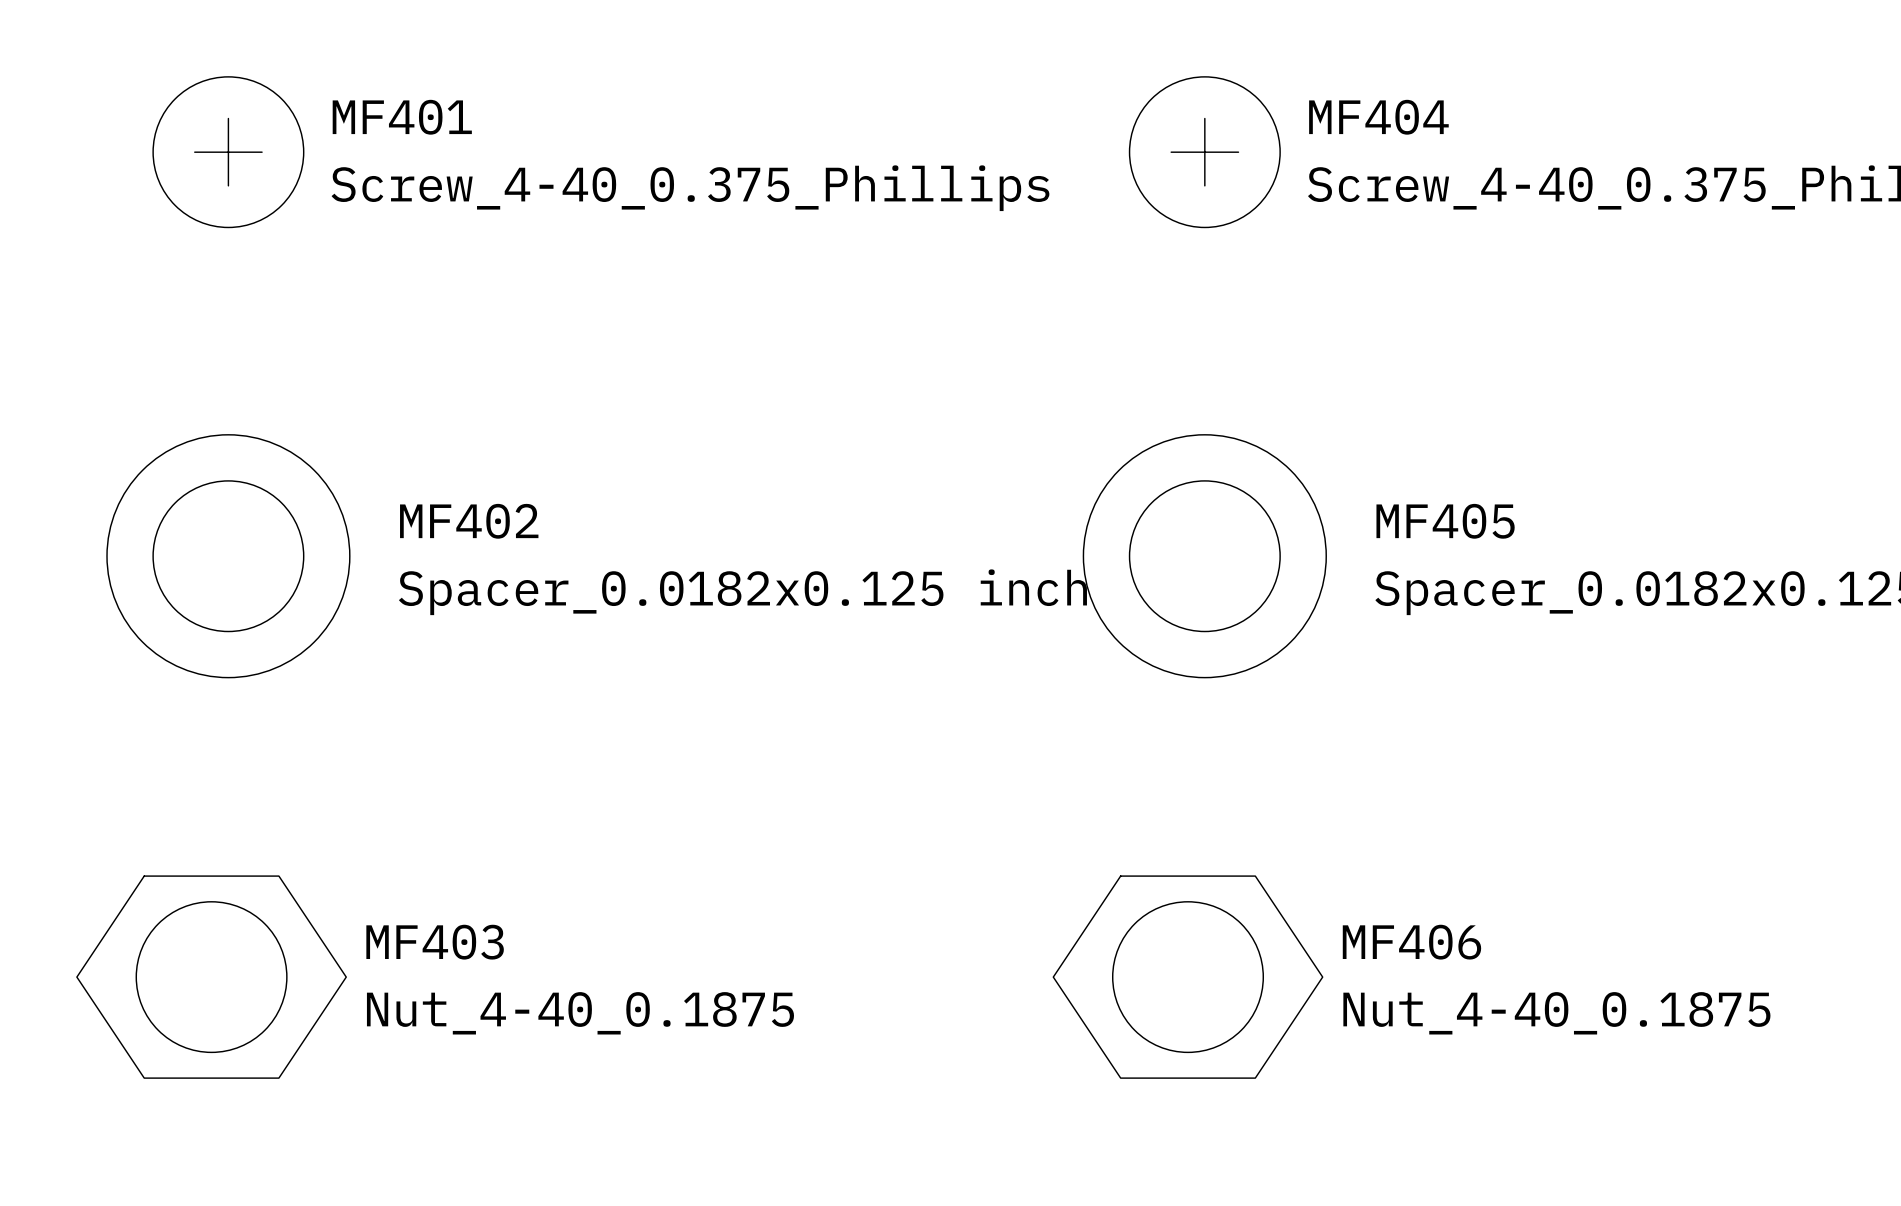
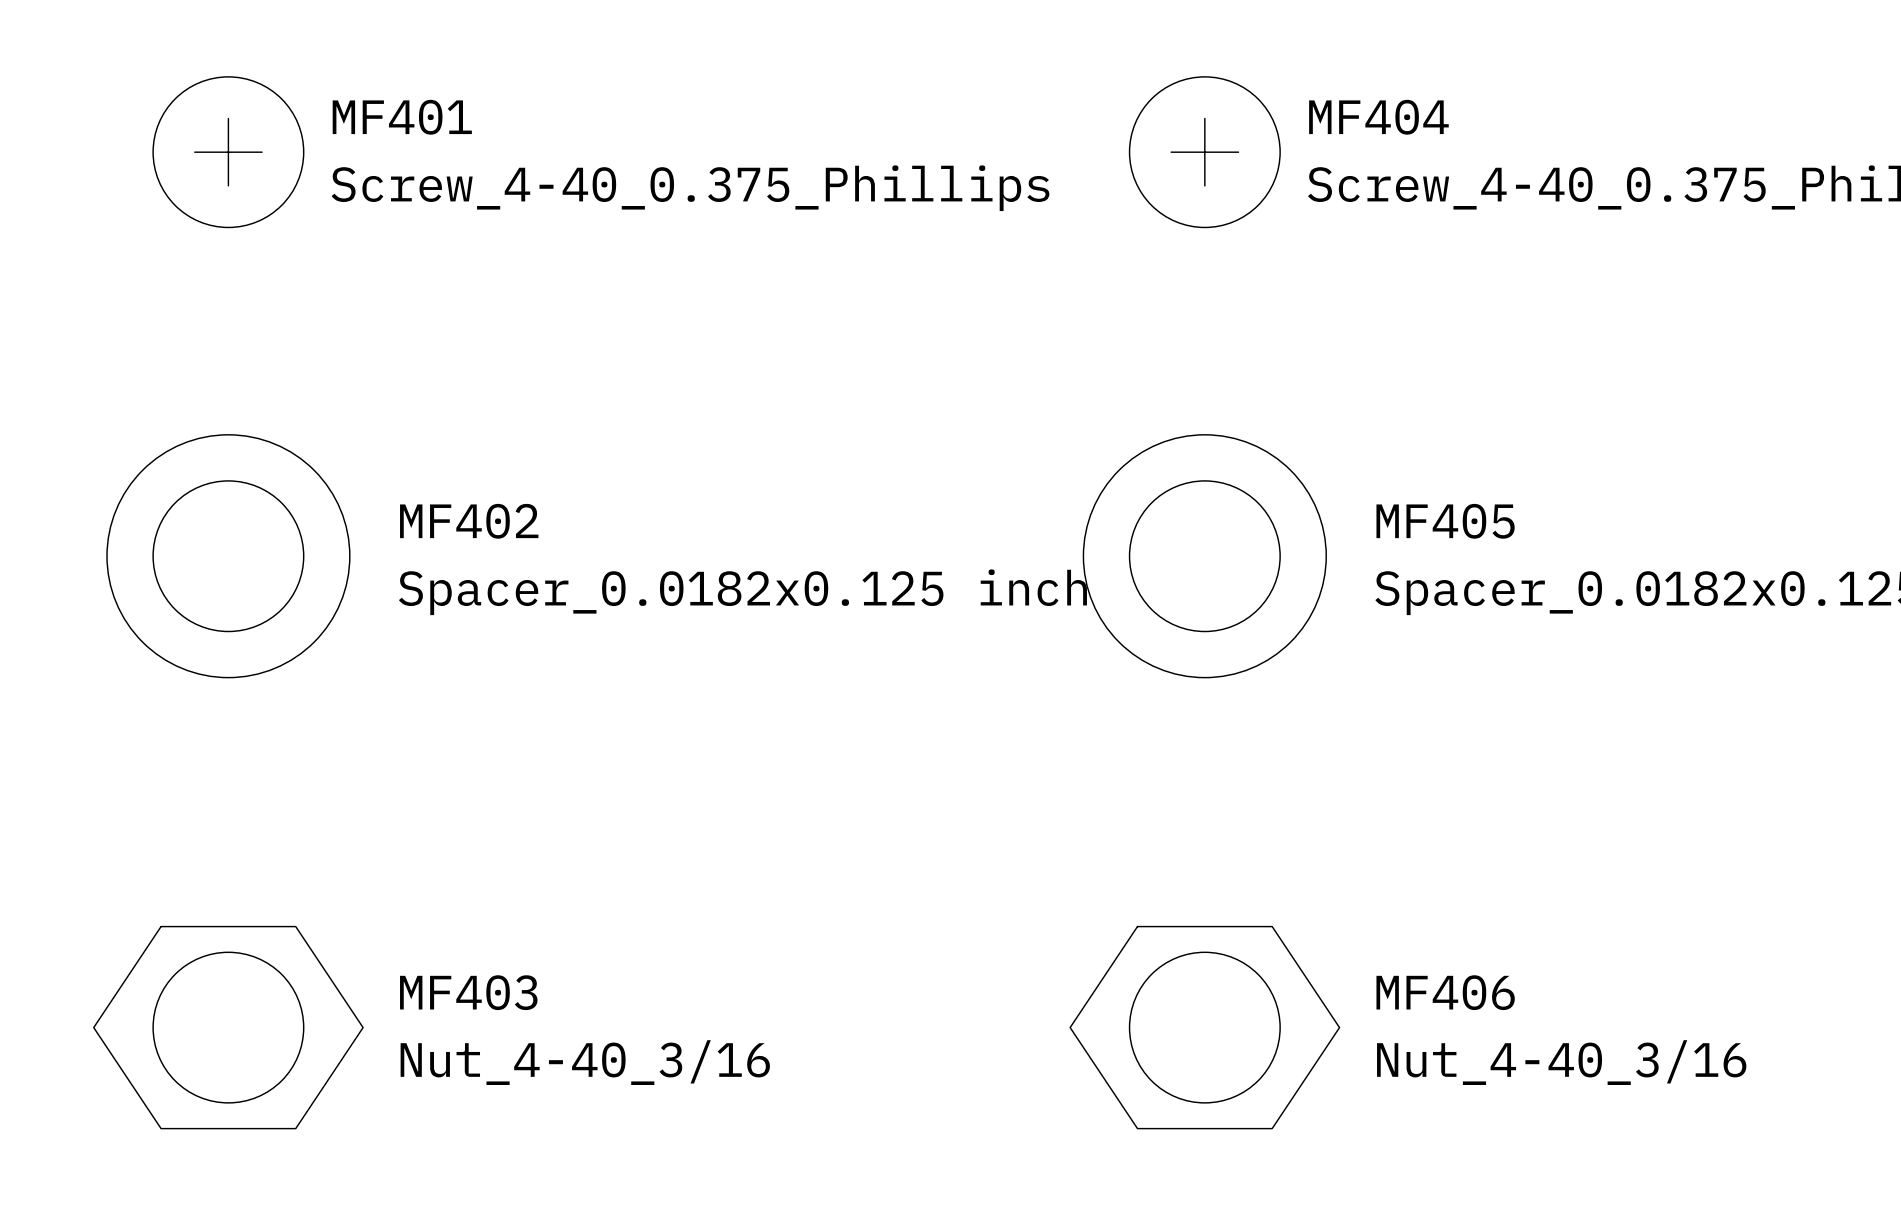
MF403 name position: MF403 (435, 942) -> MF403 (468, 992)
MF406 name position: MF406 (1411, 942) -> MF406 (1445, 992)
MF403 position: (211, 977) -> (228, 1027)
MF406 position: (1188, 977) -> (1204, 1027)
MF403 value: Nut_4-40_0.1875 (580, 1013) -> Nut_4-40_3/16 (585, 1062)
MF406 value: Nut_4-40_0.1875 (1556, 1013) -> Nut_4-40_3/16 (1561, 1062)

